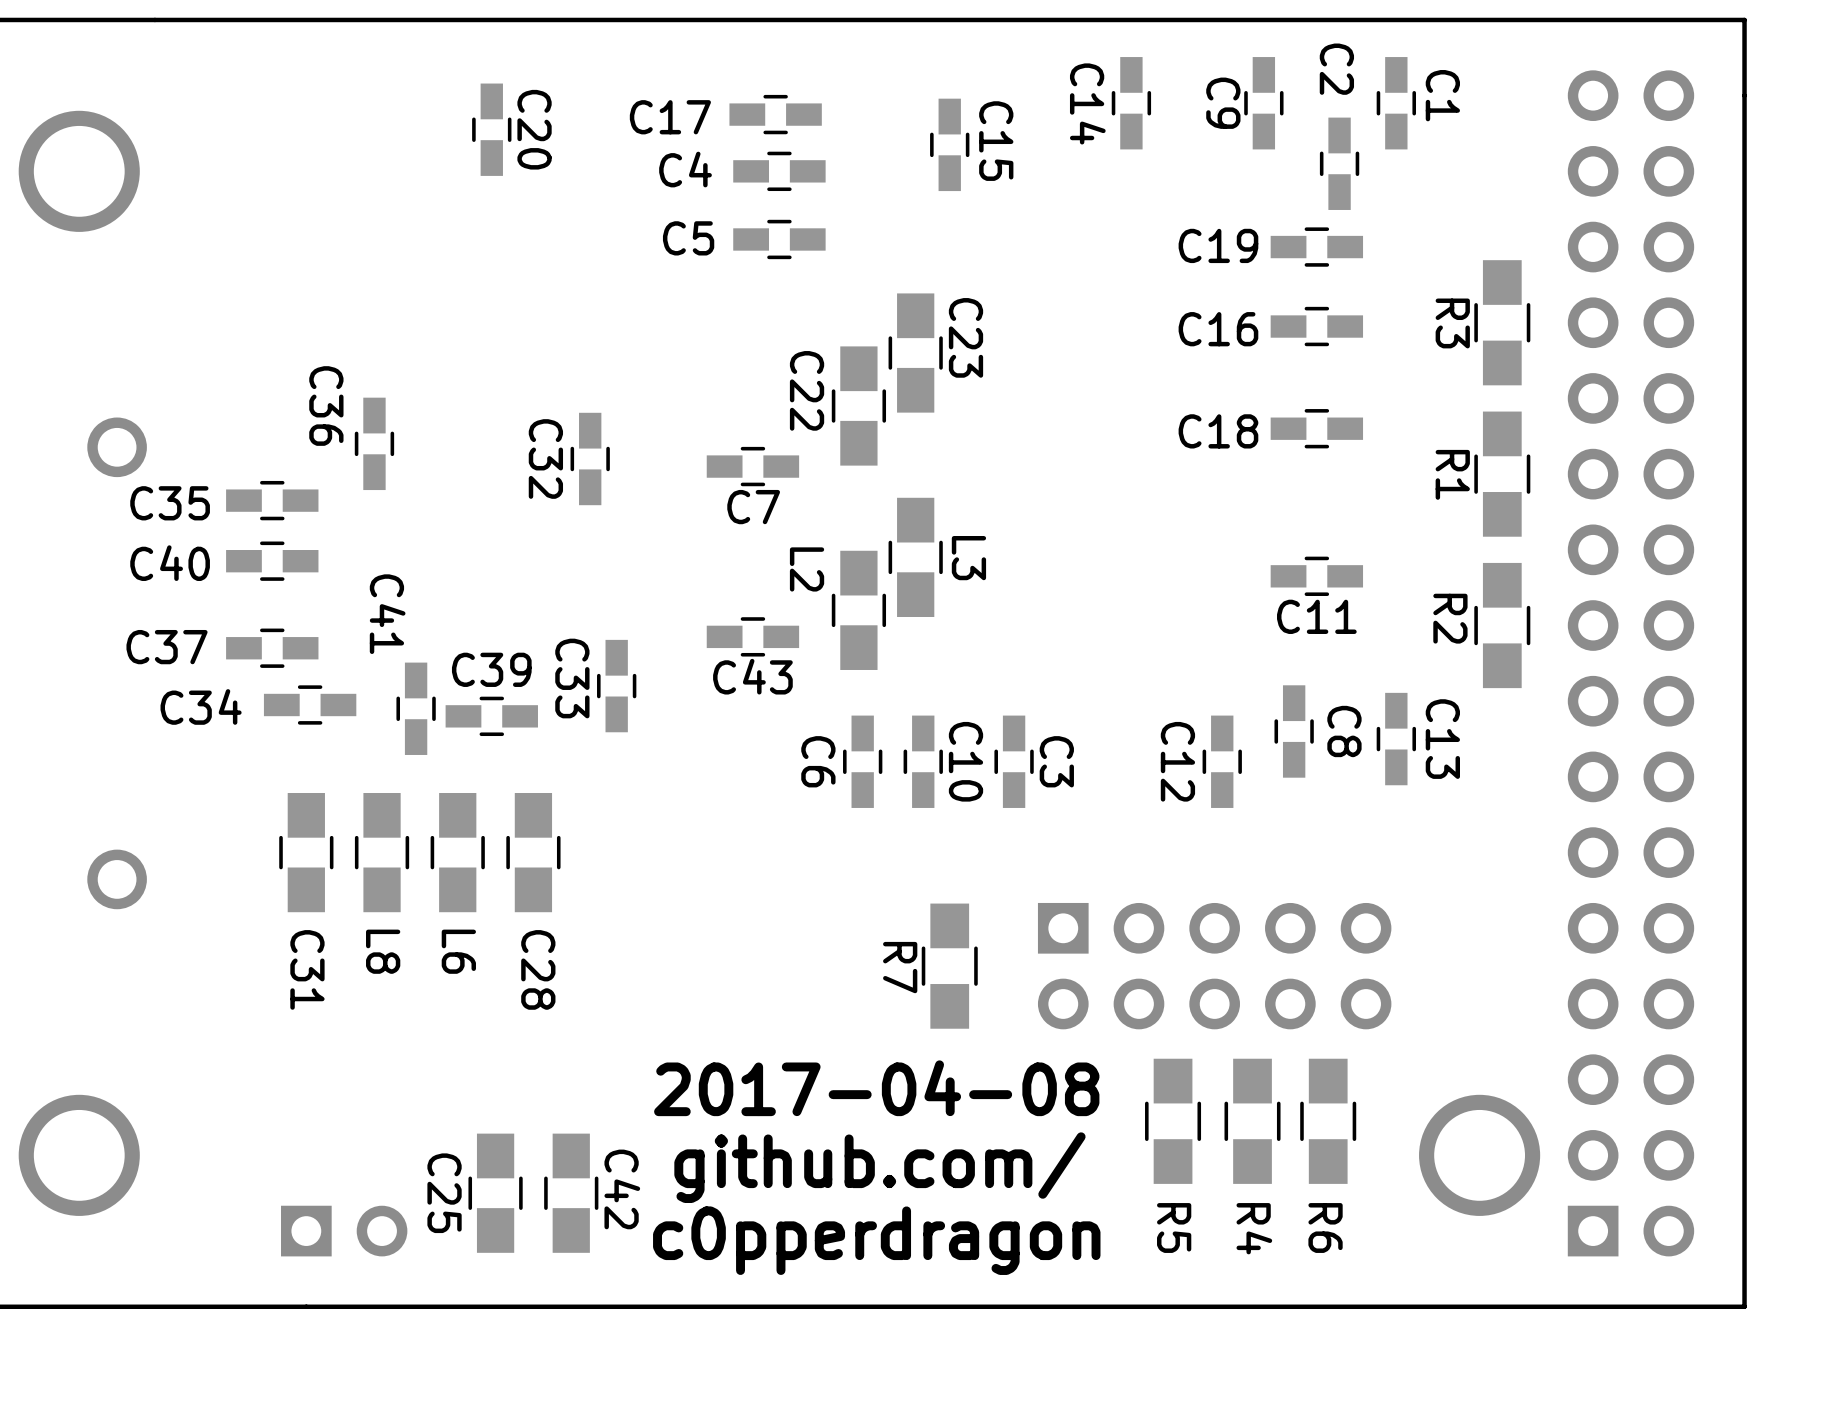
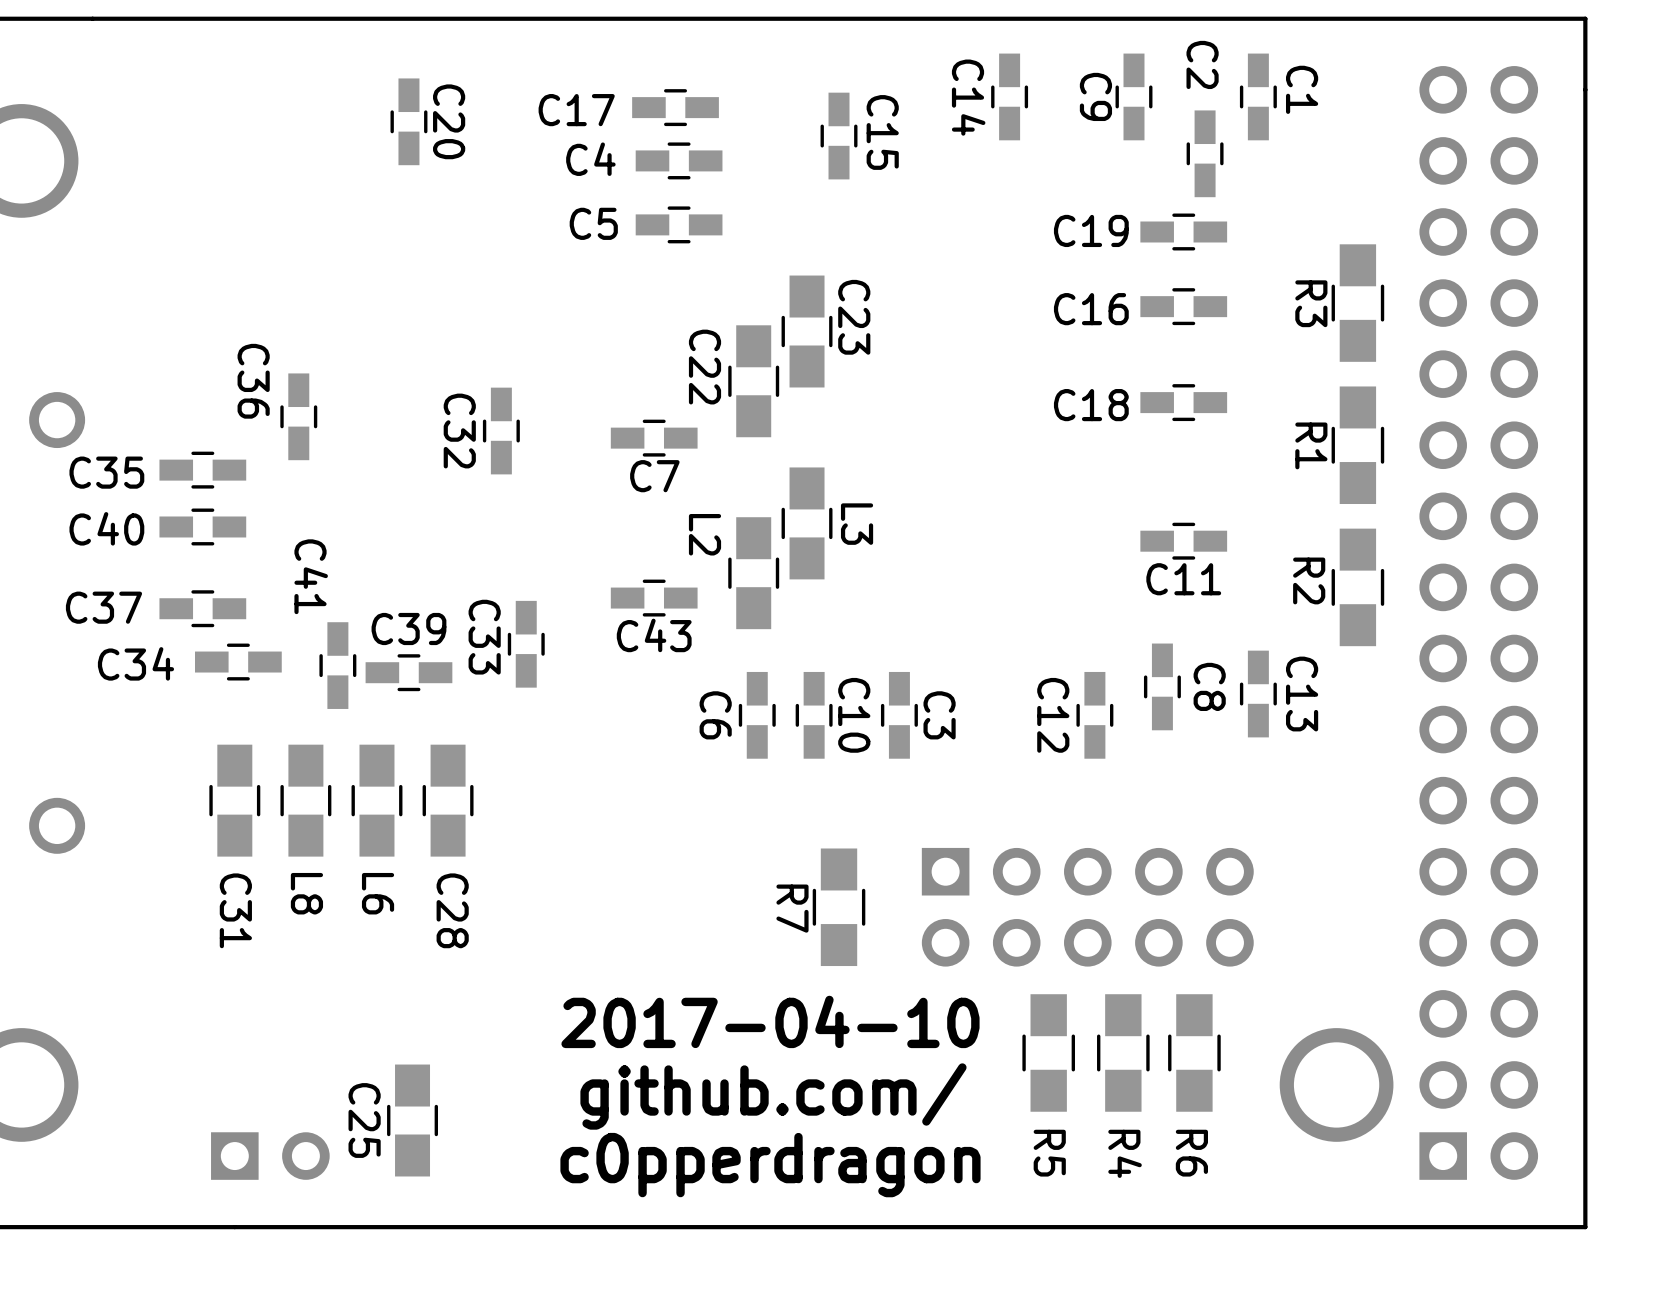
text: 2017-04-08 (876, 1088) -> 2017-04-10 (770, 1021)
C42: (571, 1193) -> none

